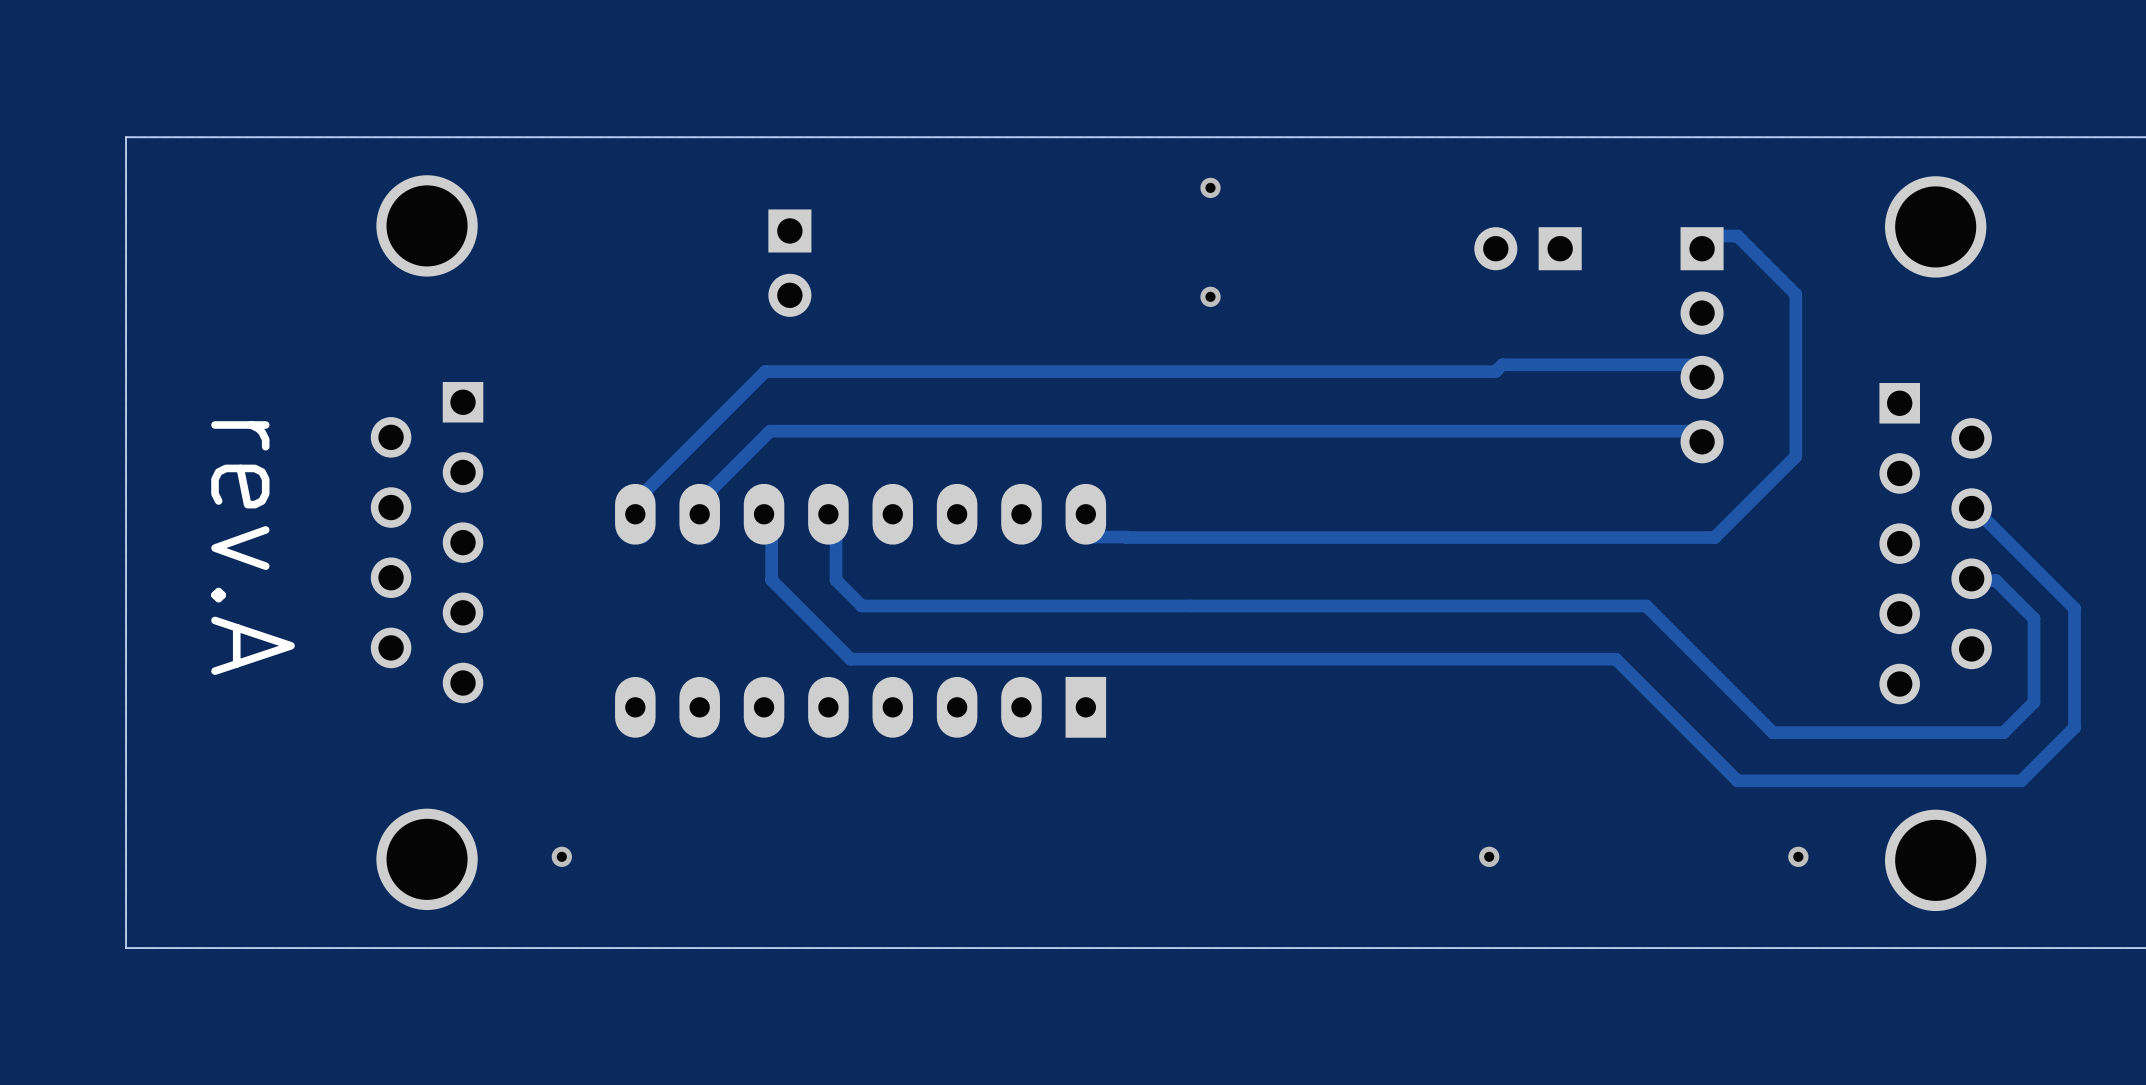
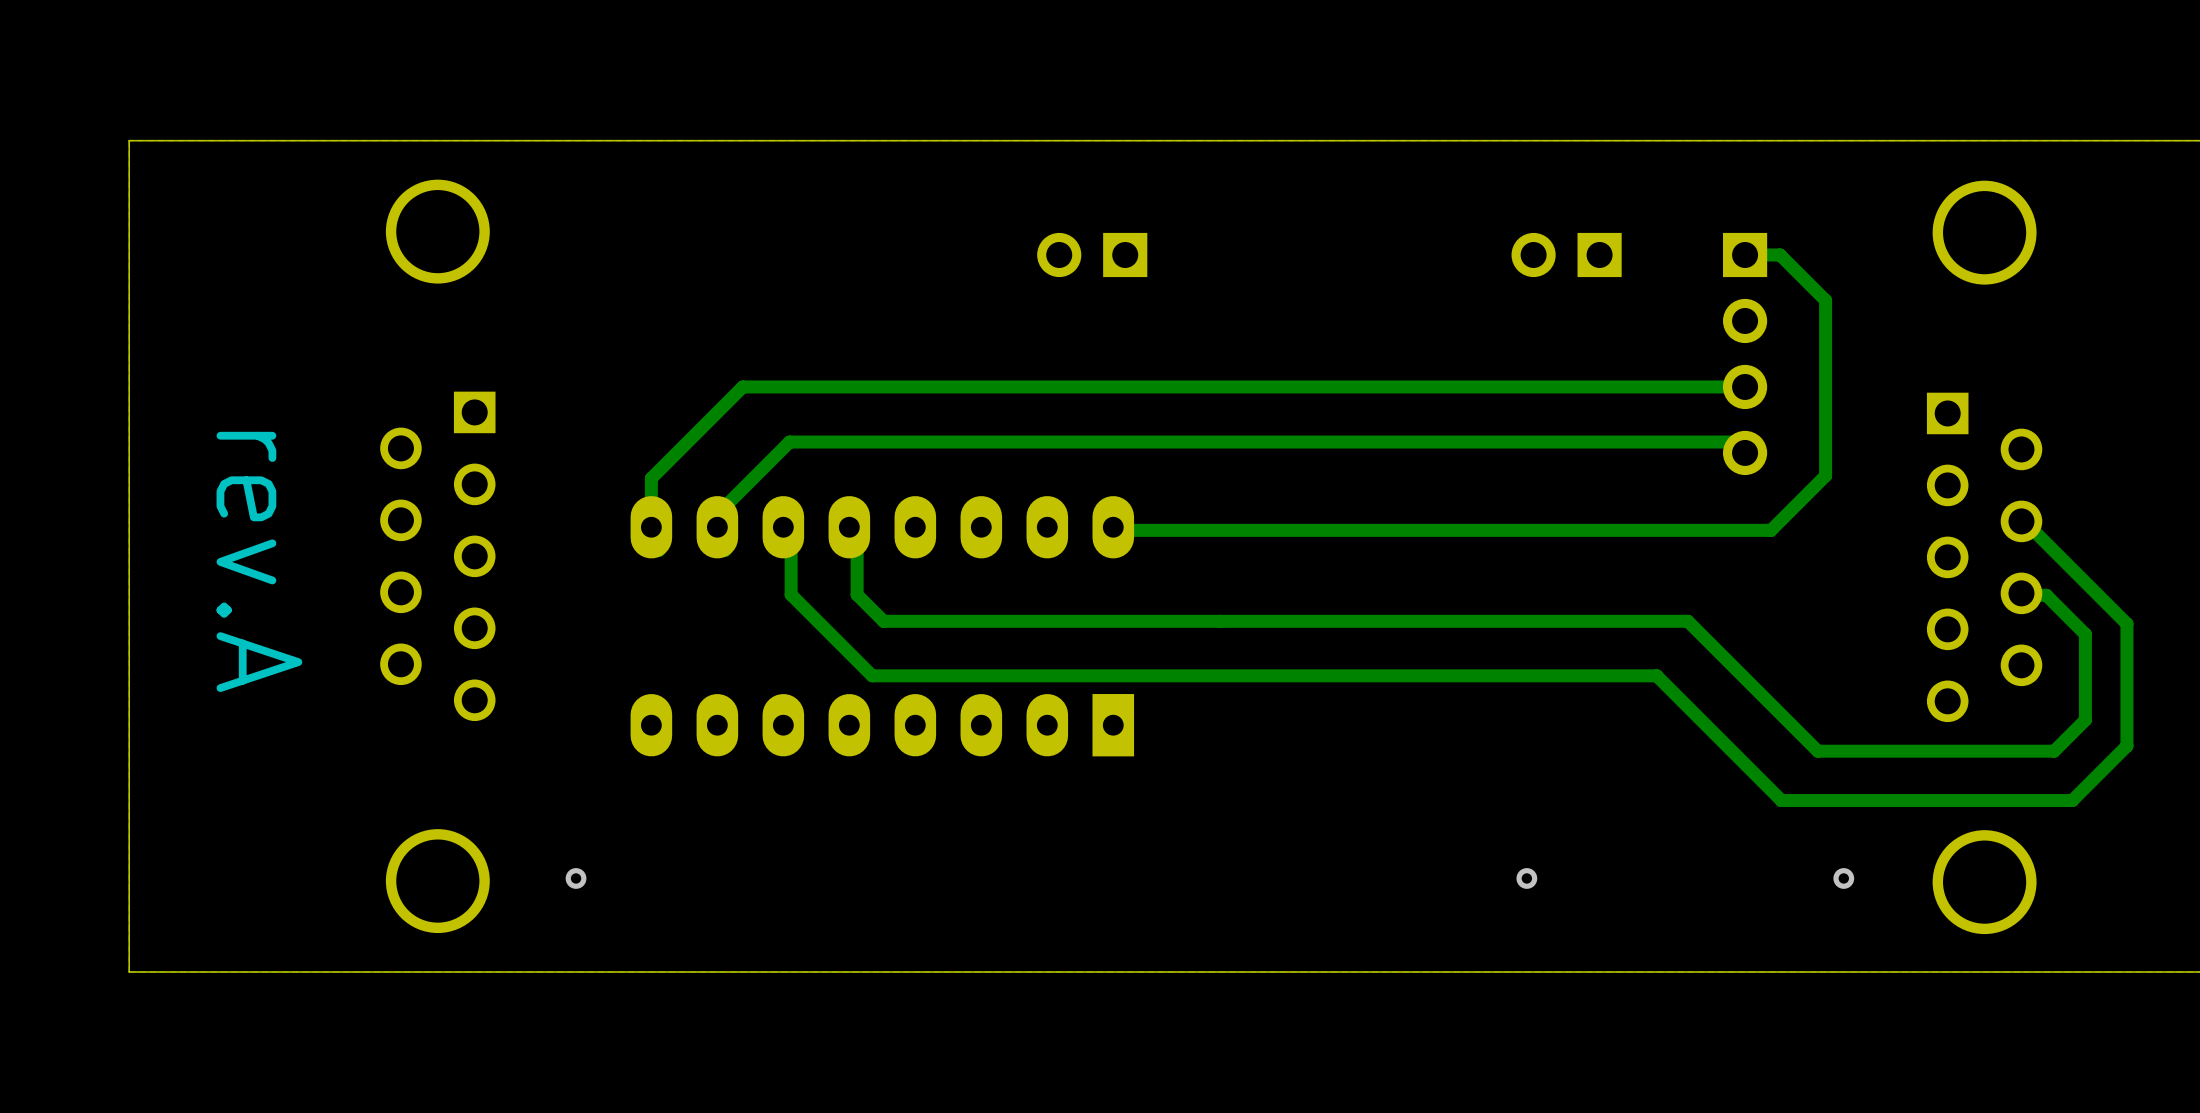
via: (1210, 187) -> none
track: (1704, 236) (1737, 236) (1795, 294) (1795, 456) (1714, 537) (1093, 537) -> none
track: none -> (1745, 254) (1780, 254) (1825, 300) (1825, 475) (1771, 530) (1113, 530)
part rotation: 0° (789, 263) -> 90° clockwise (1092, 254)
part position: (789, 263) -> (1092, 254)
via: (1210, 296) -> none
track: (1702, 364) (1502, 364) (1495, 371) (765, 371) (642, 493) -> none
track: none -> (1745, 386) (742, 386) (651, 478) (651, 527)

